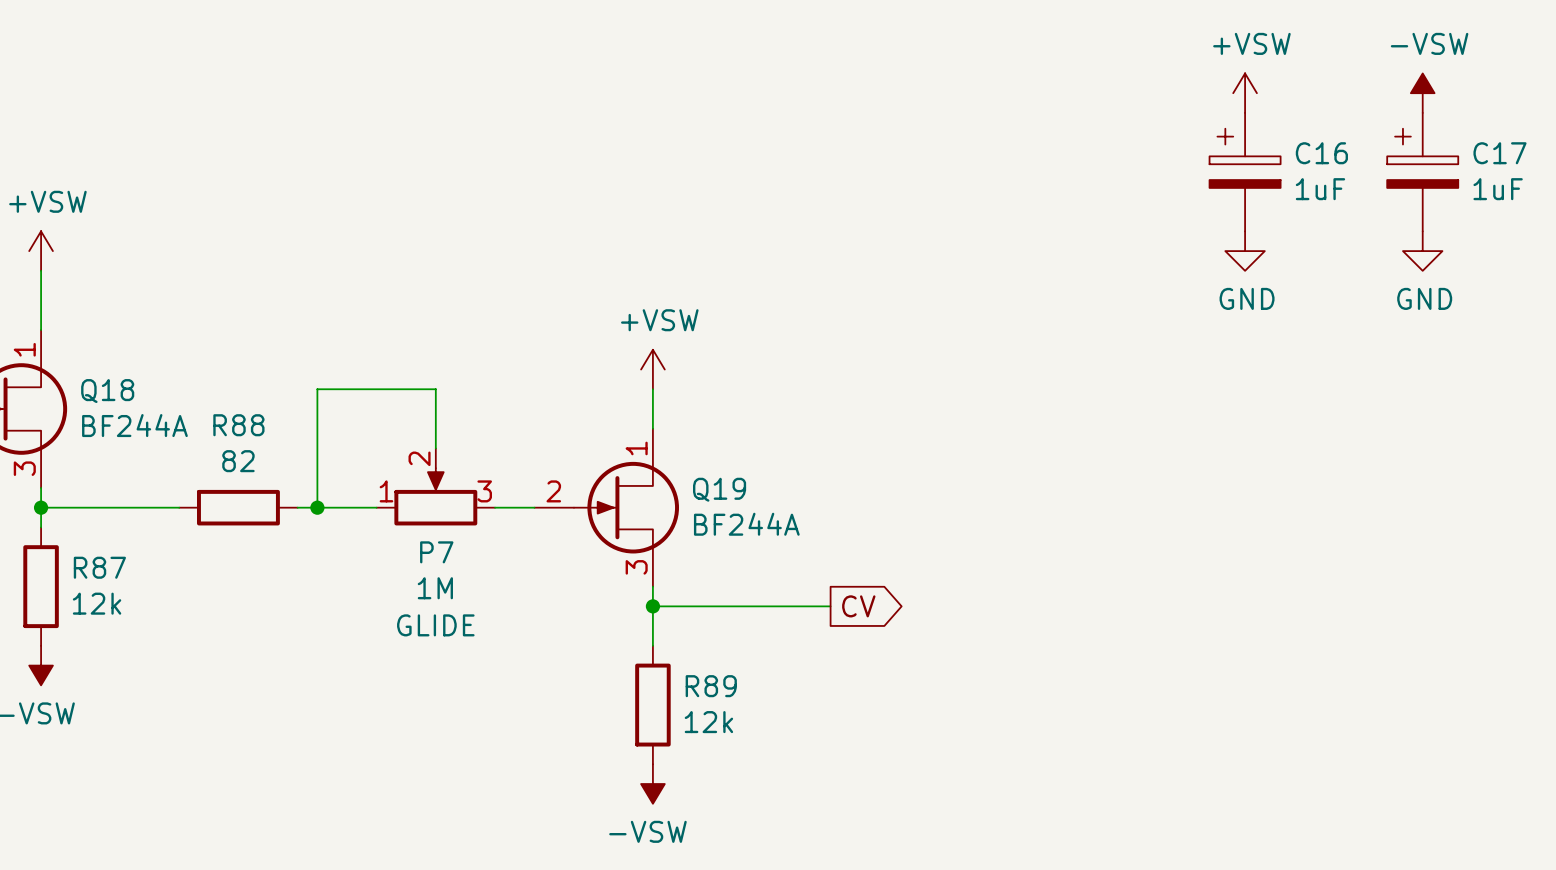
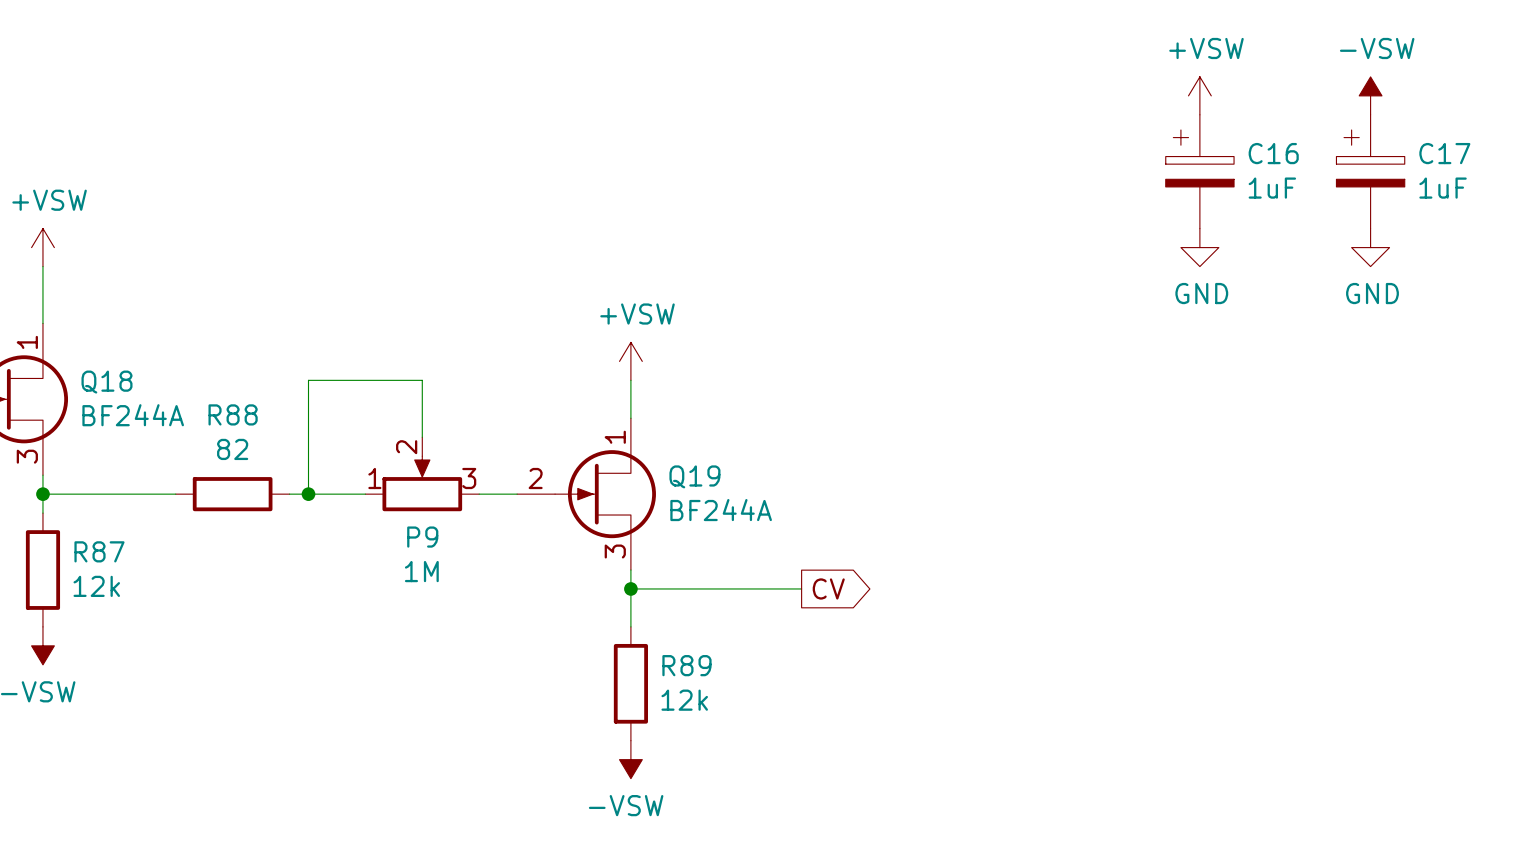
P7 name: P7 (436, 552) -> P9 (422, 537)
P7 text: GLIDE (435, 625) -> none

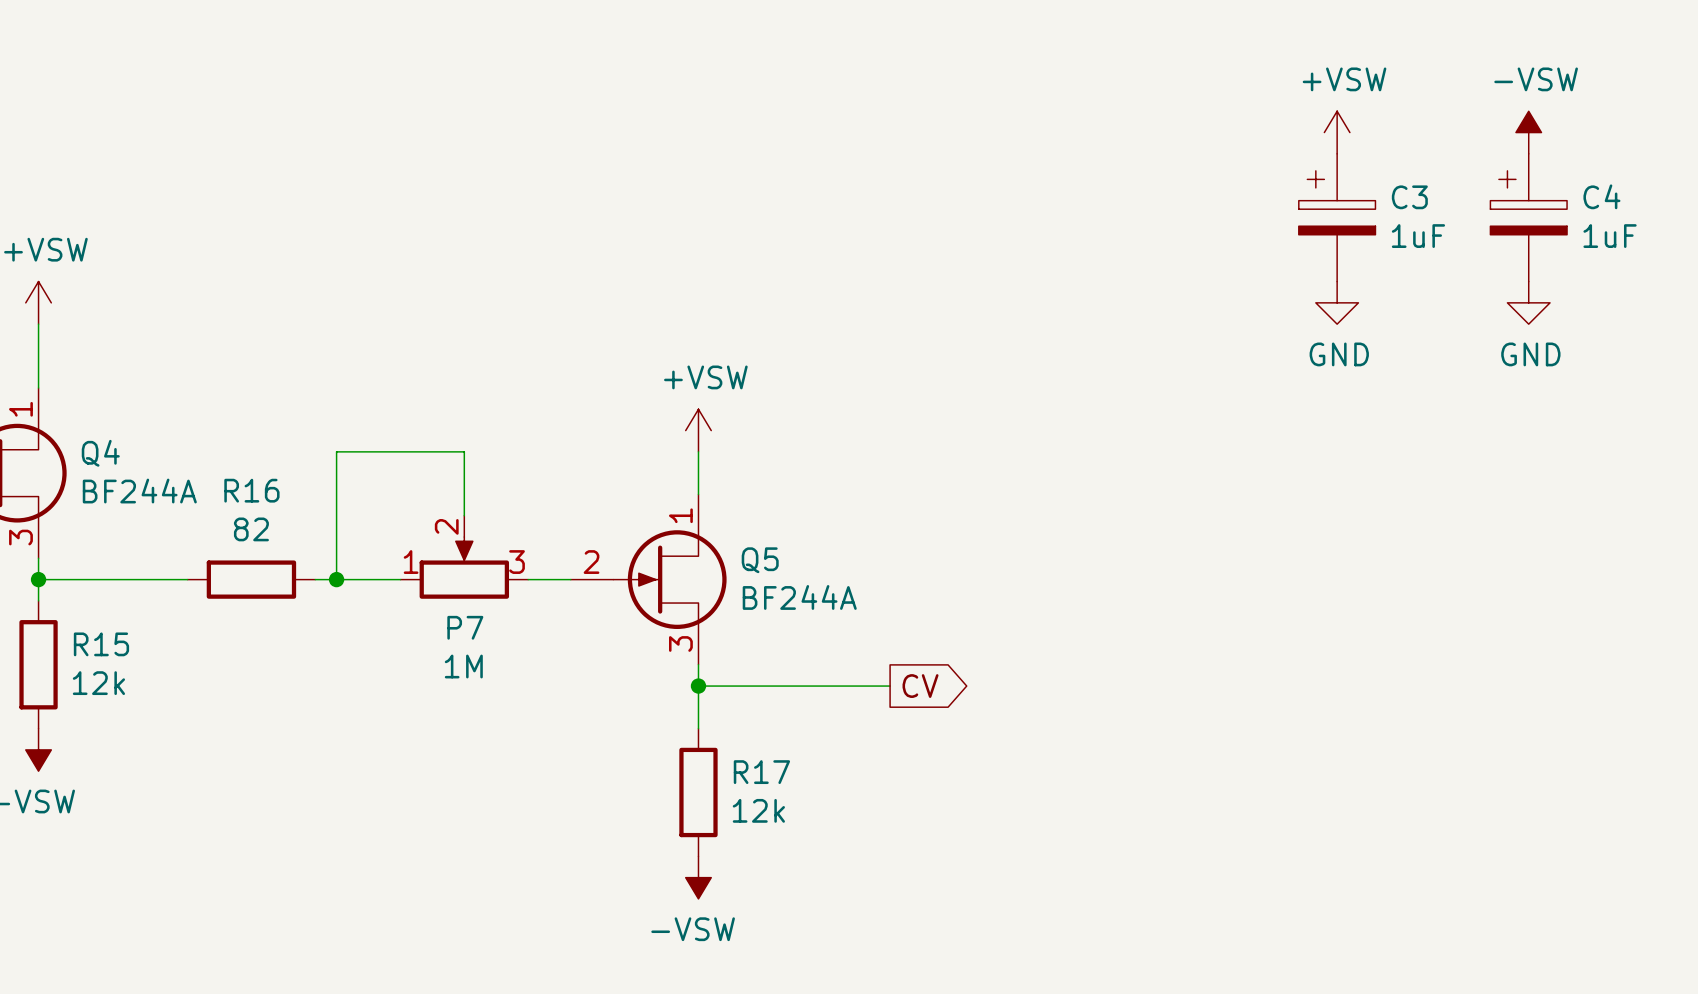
C16 name: C16 (1273, 153) -> C3 (1409, 197)
C17 name: C17 (1444, 153) -> C4 (1601, 196)
Q18 name: Q18 (106, 382) -> Q4 (100, 453)
R88 name: R88 (233, 414) -> R16 (251, 490)
Q19 name: Q19 (694, 476) -> Q5 (760, 560)
P9 name: P9 (422, 537) -> P7 (465, 627)
R87 name: R87 (99, 551) -> R15 (101, 644)
R89 name: R89 (686, 665) -> R17 (761, 772)

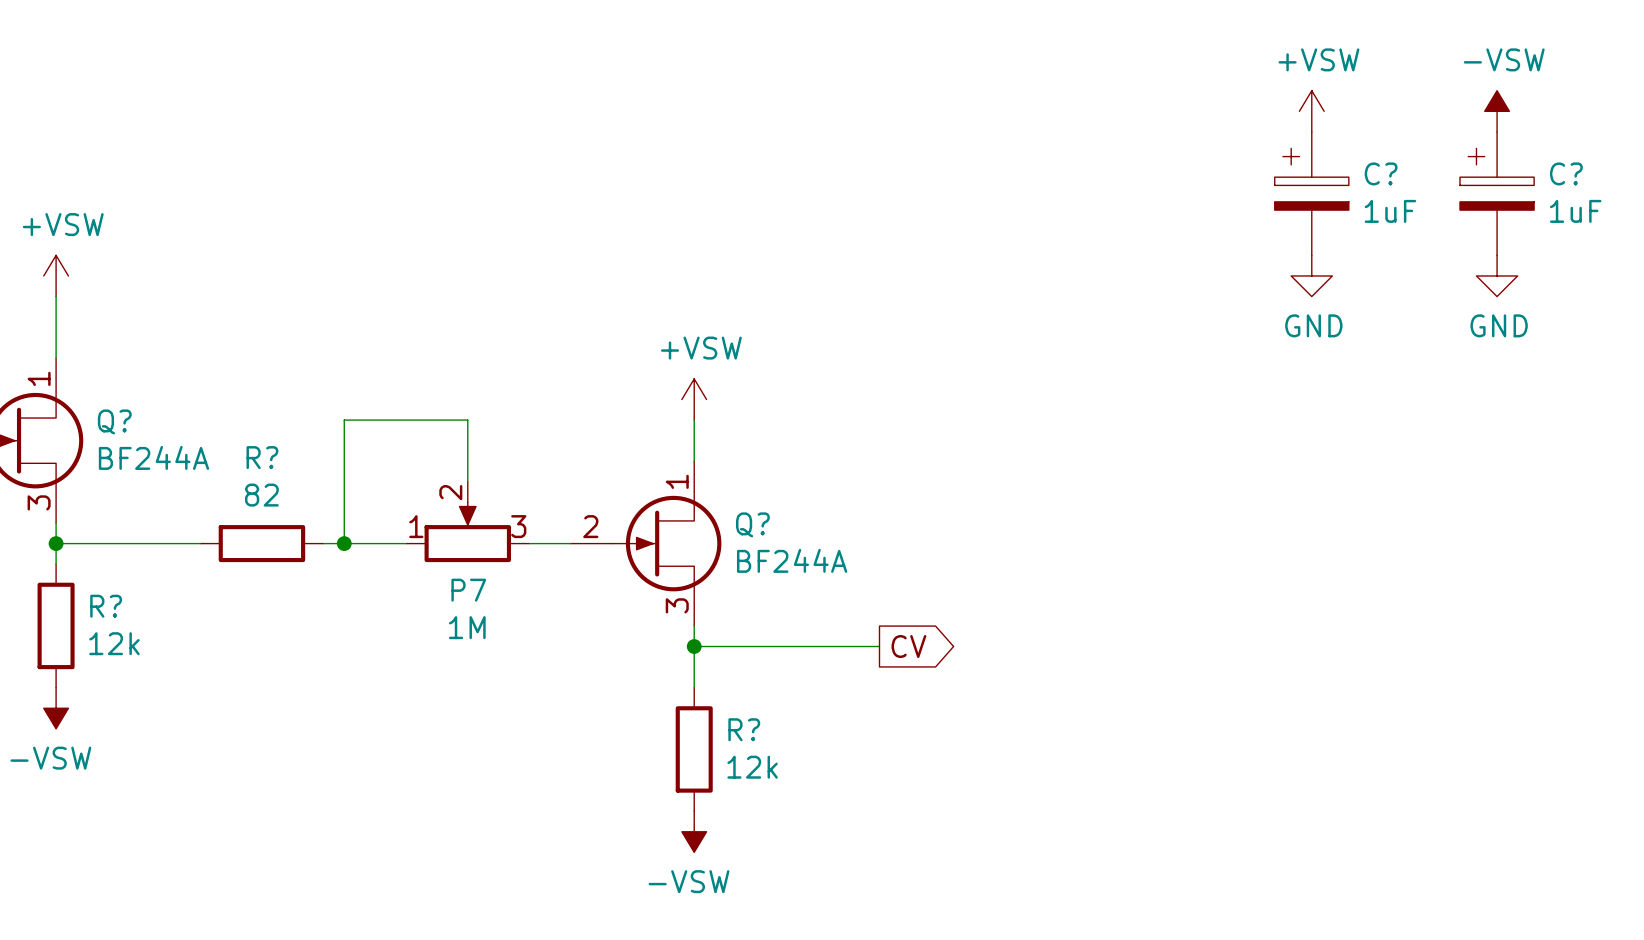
C4 name: C4 (1601, 196) -> C? (1566, 173)
C3 name: C3 (1409, 197) -> C? (1381, 173)
Q4 name: Q4 (100, 453) -> Q? (114, 421)
R16 name: R16 (251, 490) -> R? (262, 457)
Q5 name: Q5 (760, 560) -> Q? (752, 524)
R15 name: R15 (101, 644) -> R? (106, 606)
R17 name: R17 (761, 772) -> R? (744, 729)

